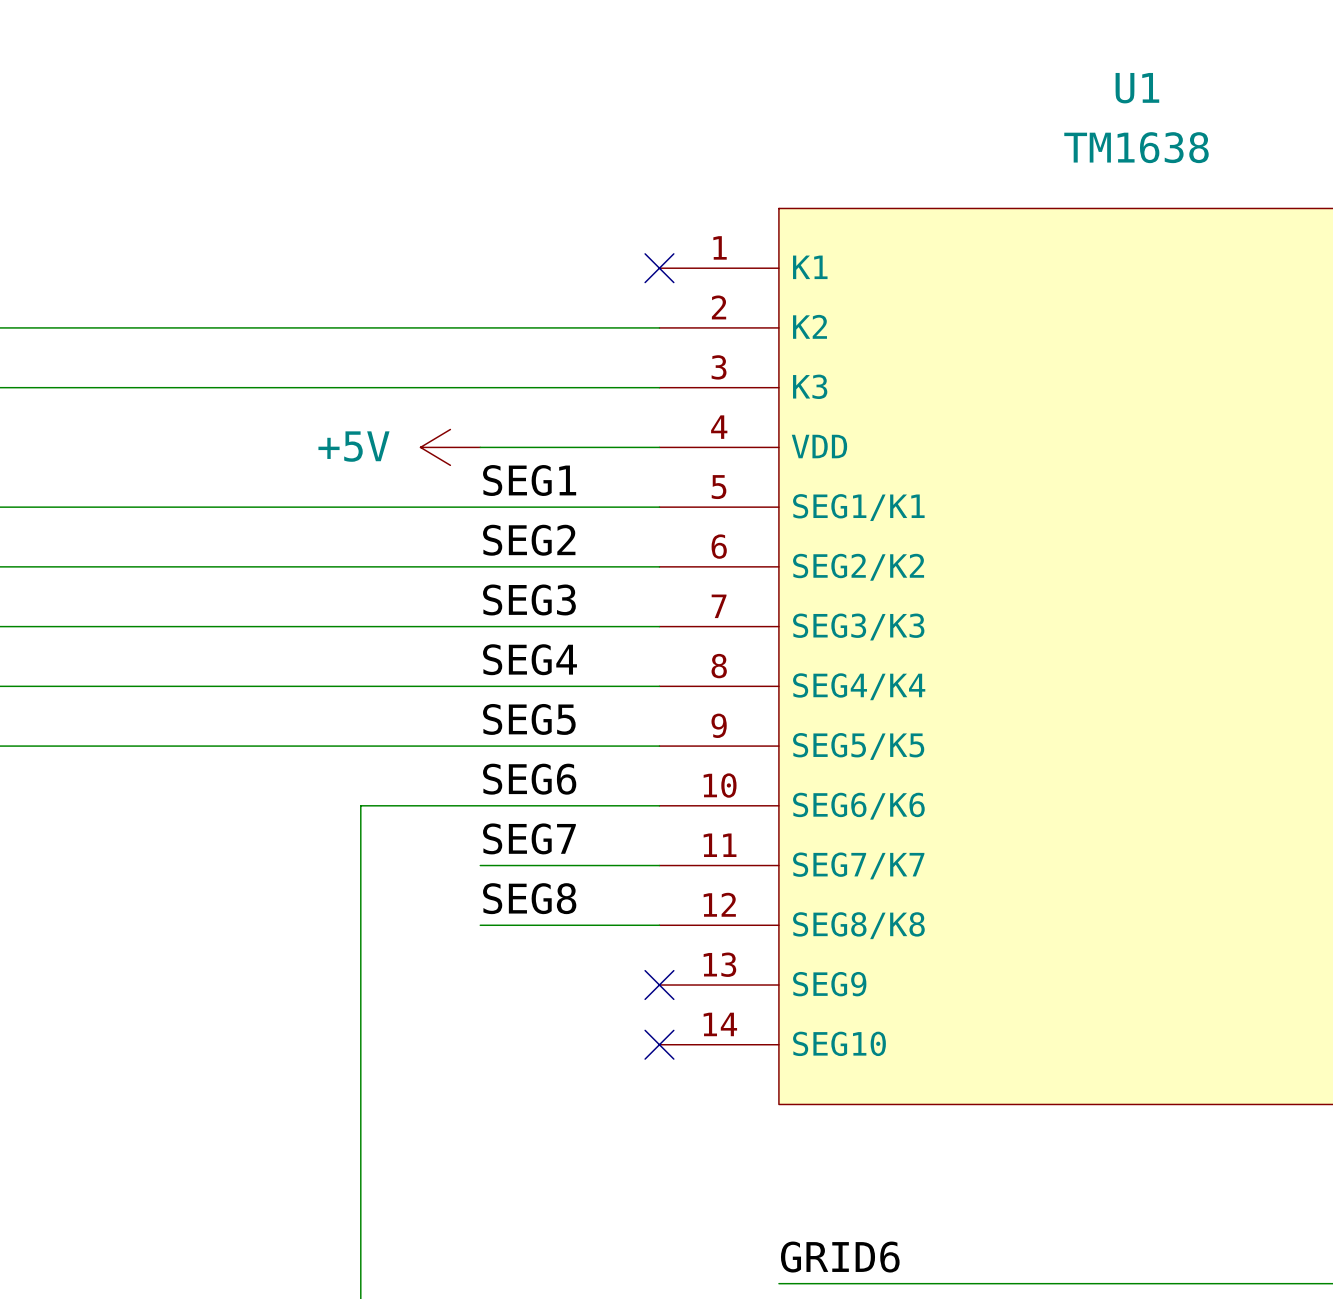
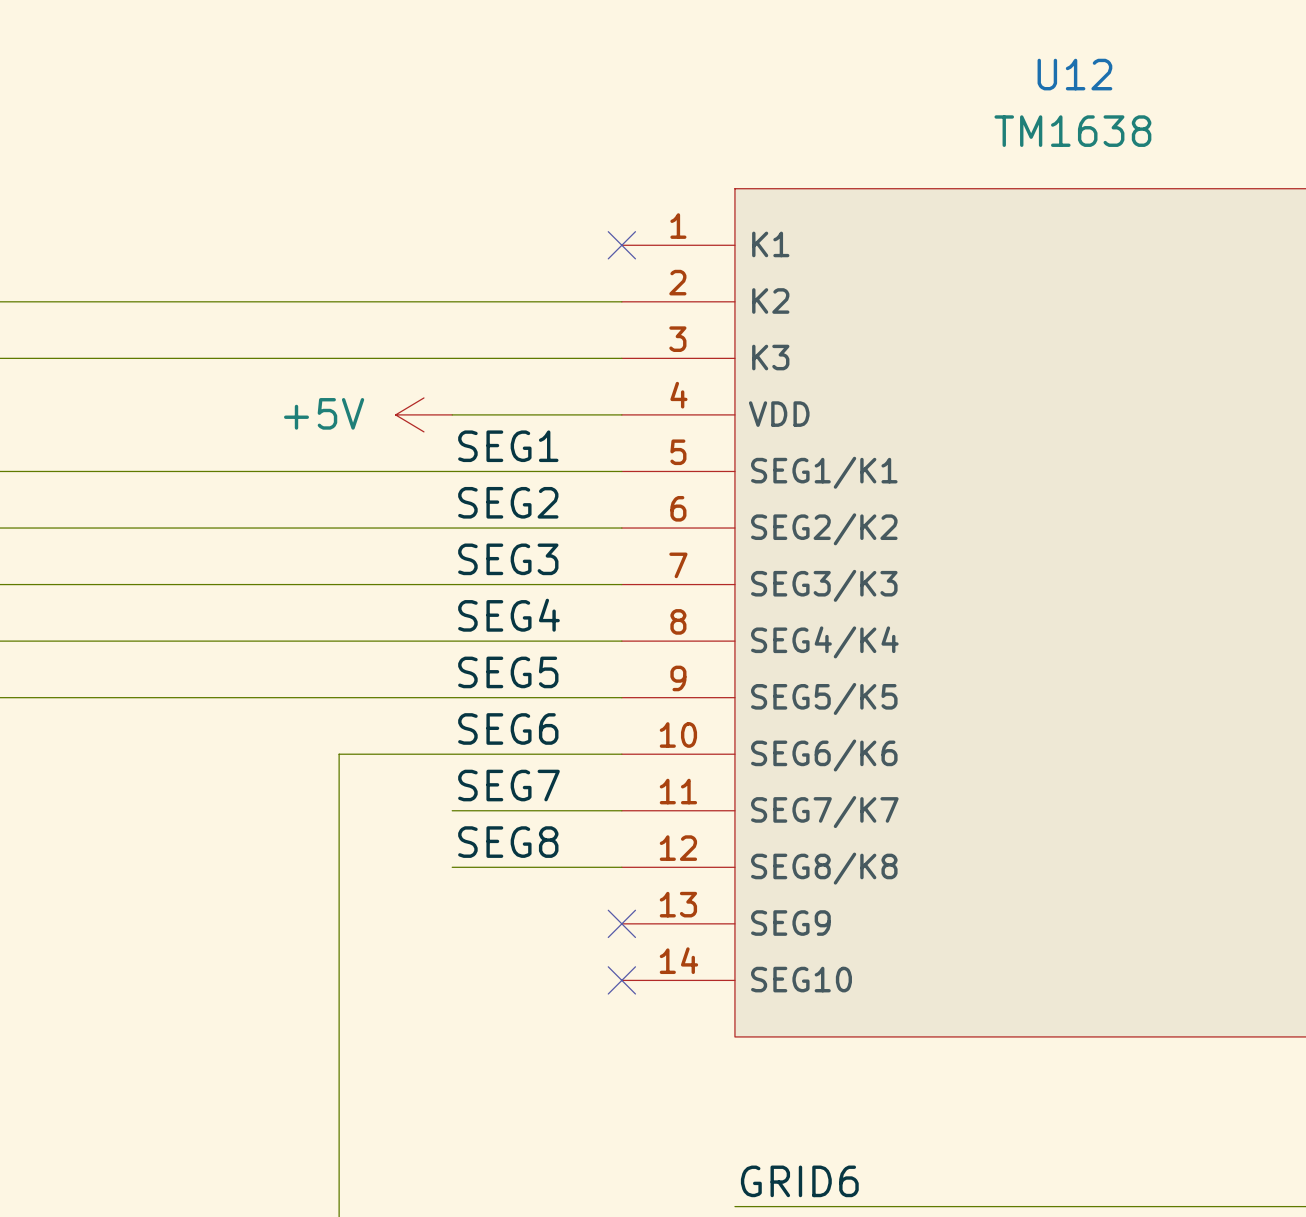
U1 name: U1 (1137, 88) -> U12 (1074, 74)

